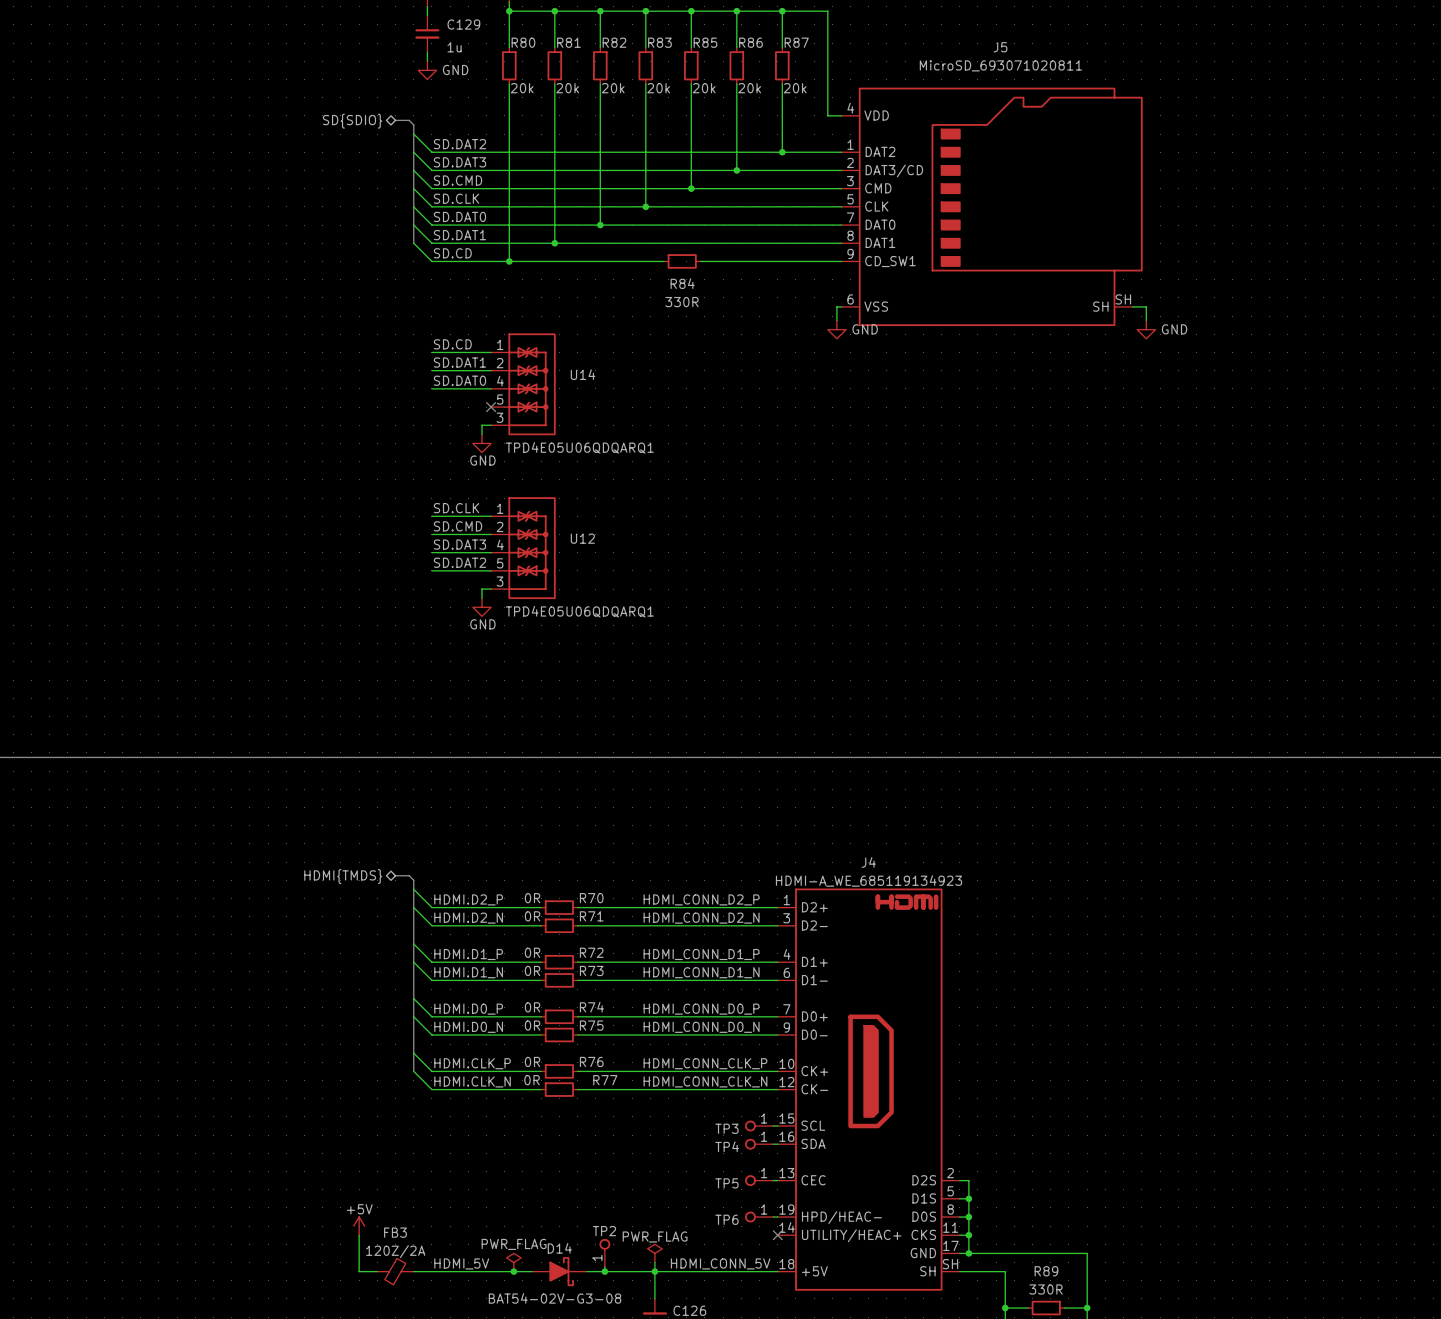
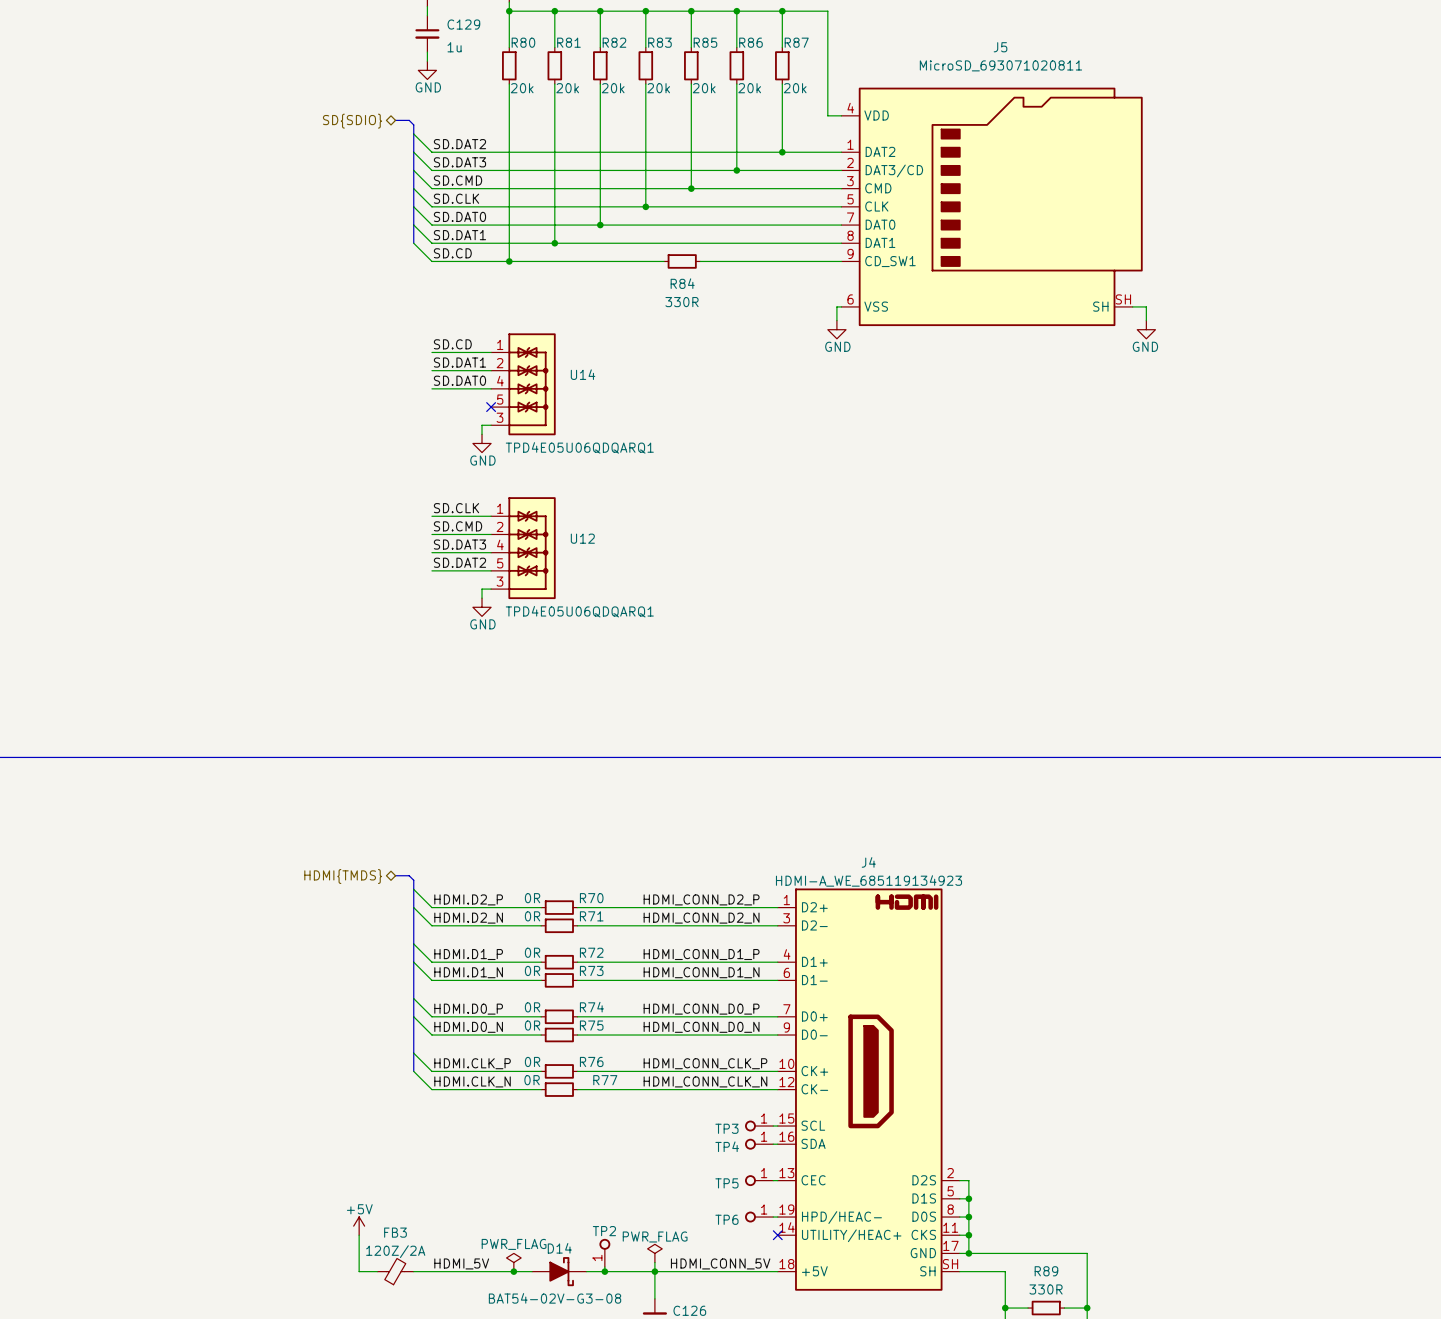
power symbol text position: GND (455, 70) -> GND (428, 87)
power symbol text position: GND (865, 329) -> GND (837, 346)
power symbol text position: GND (1174, 329) -> GND (1145, 346)

